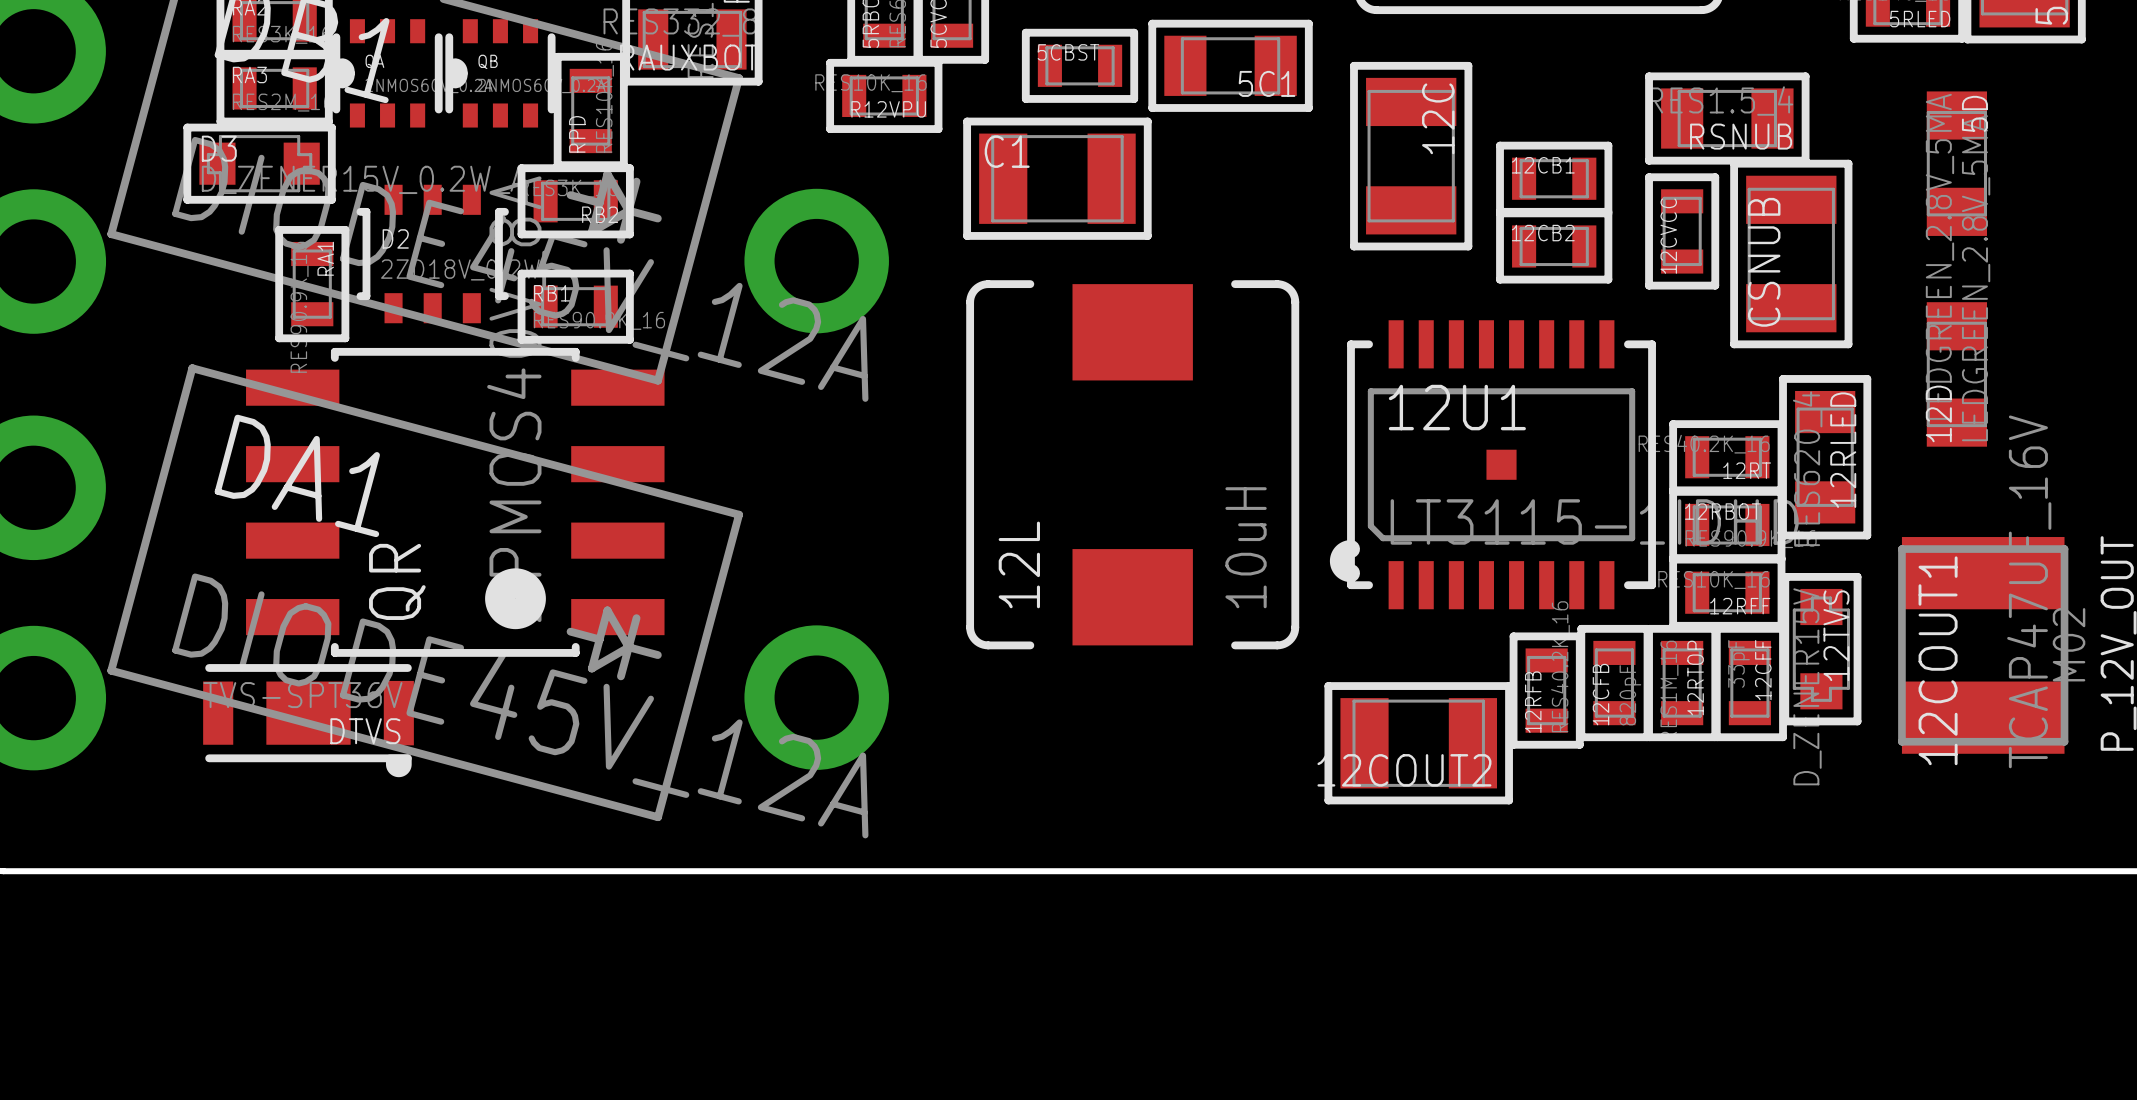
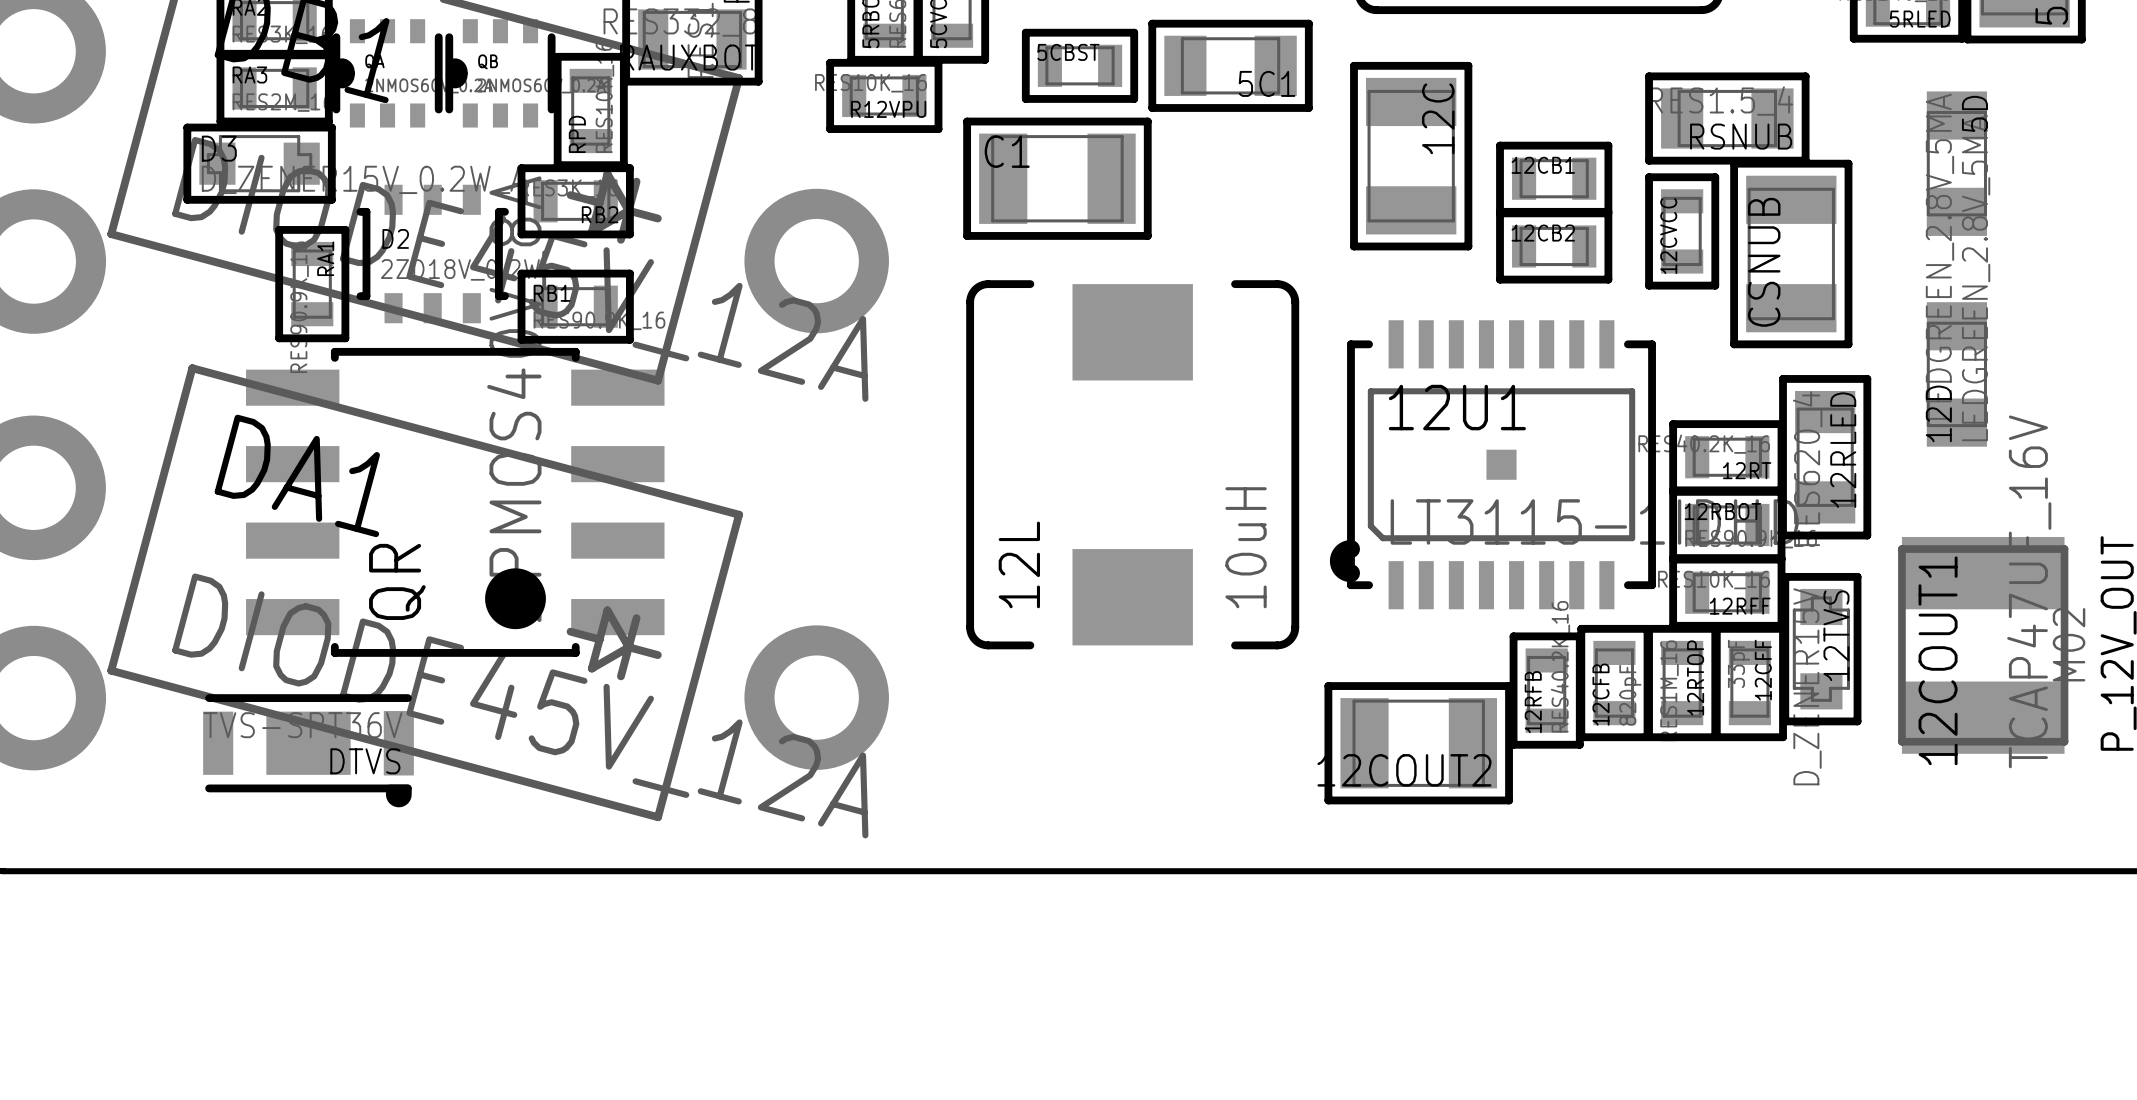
DTVS position: (308, 720) -> (308, 750)

